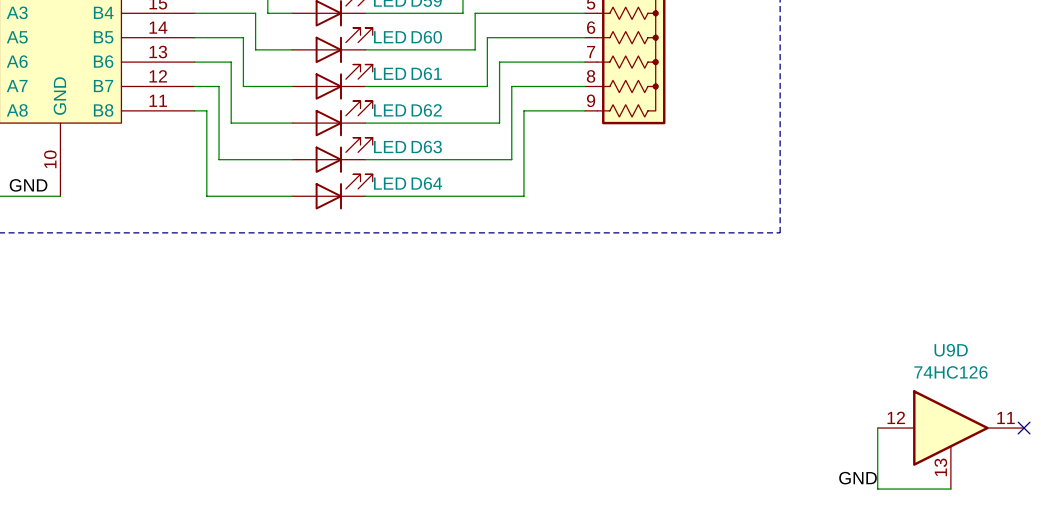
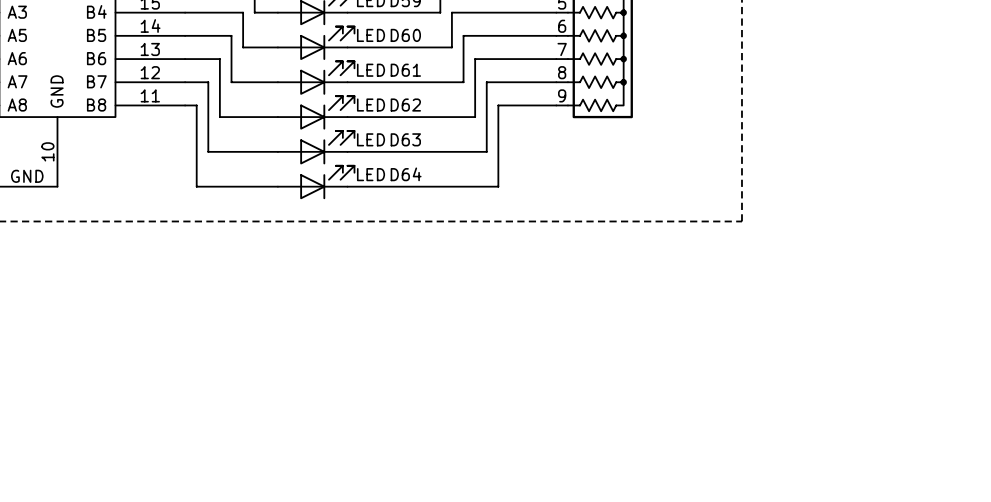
wire: (877, 428) (877, 489) (950, 489) -> none
no-connect mark: (1024, 428) -> none
U9D: 74HC126 (950, 439) -> none
label: GND (858, 478) -> none

